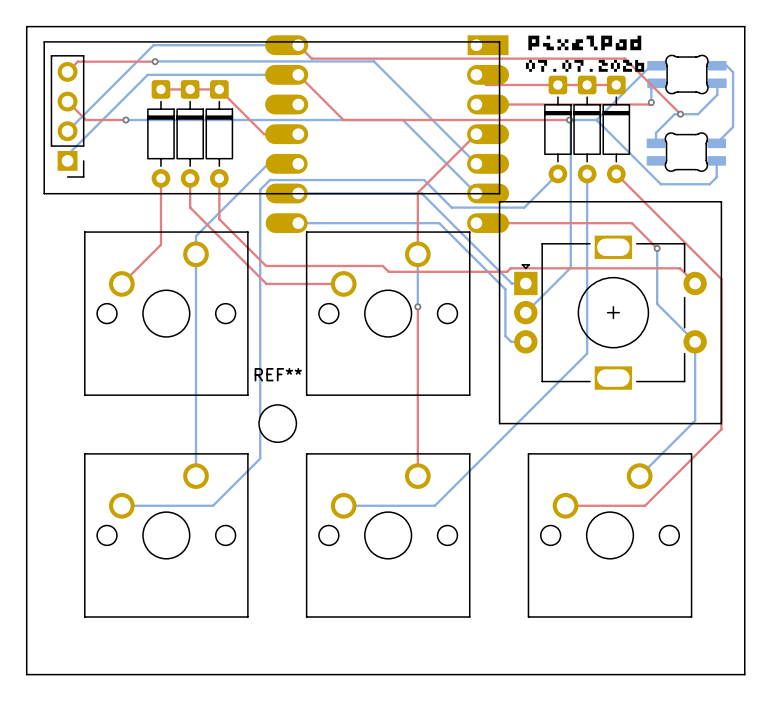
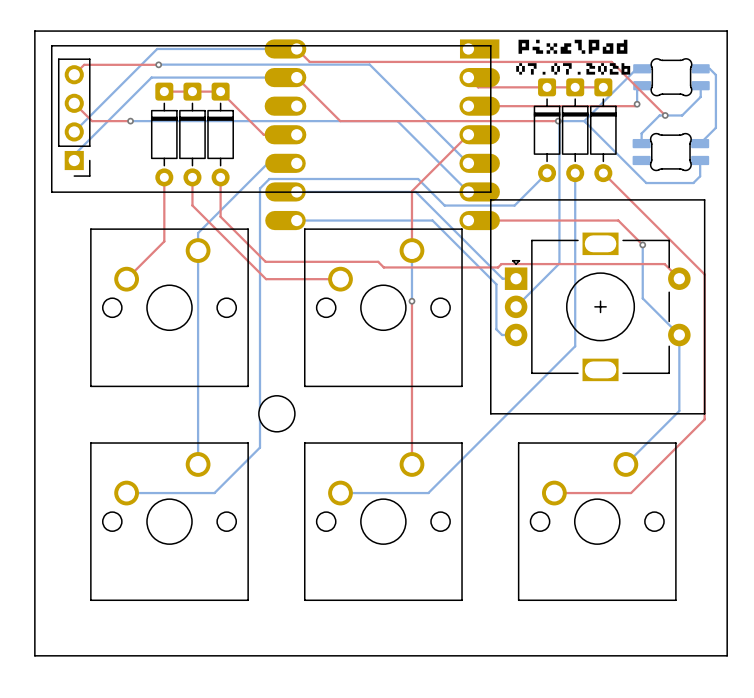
REF** name: REF** (278, 374) -> none

